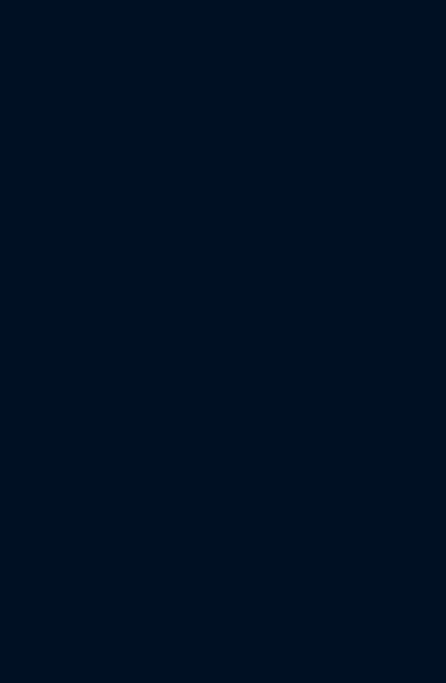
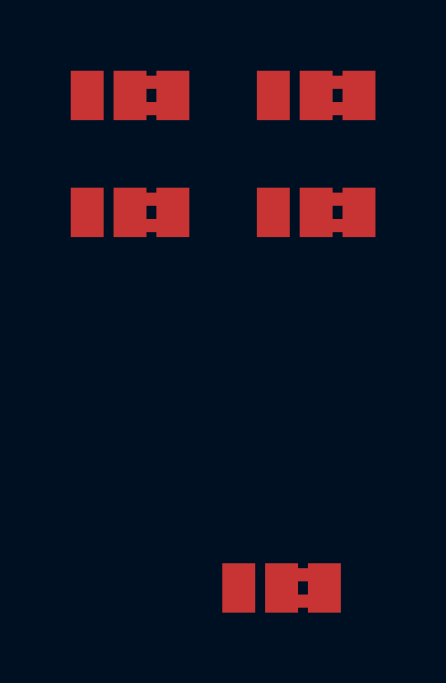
part: none -> (130, 95)
part: none -> (316, 95)
part: none -> (130, 212)
part: none -> (316, 212)
part: none -> (281, 587)

